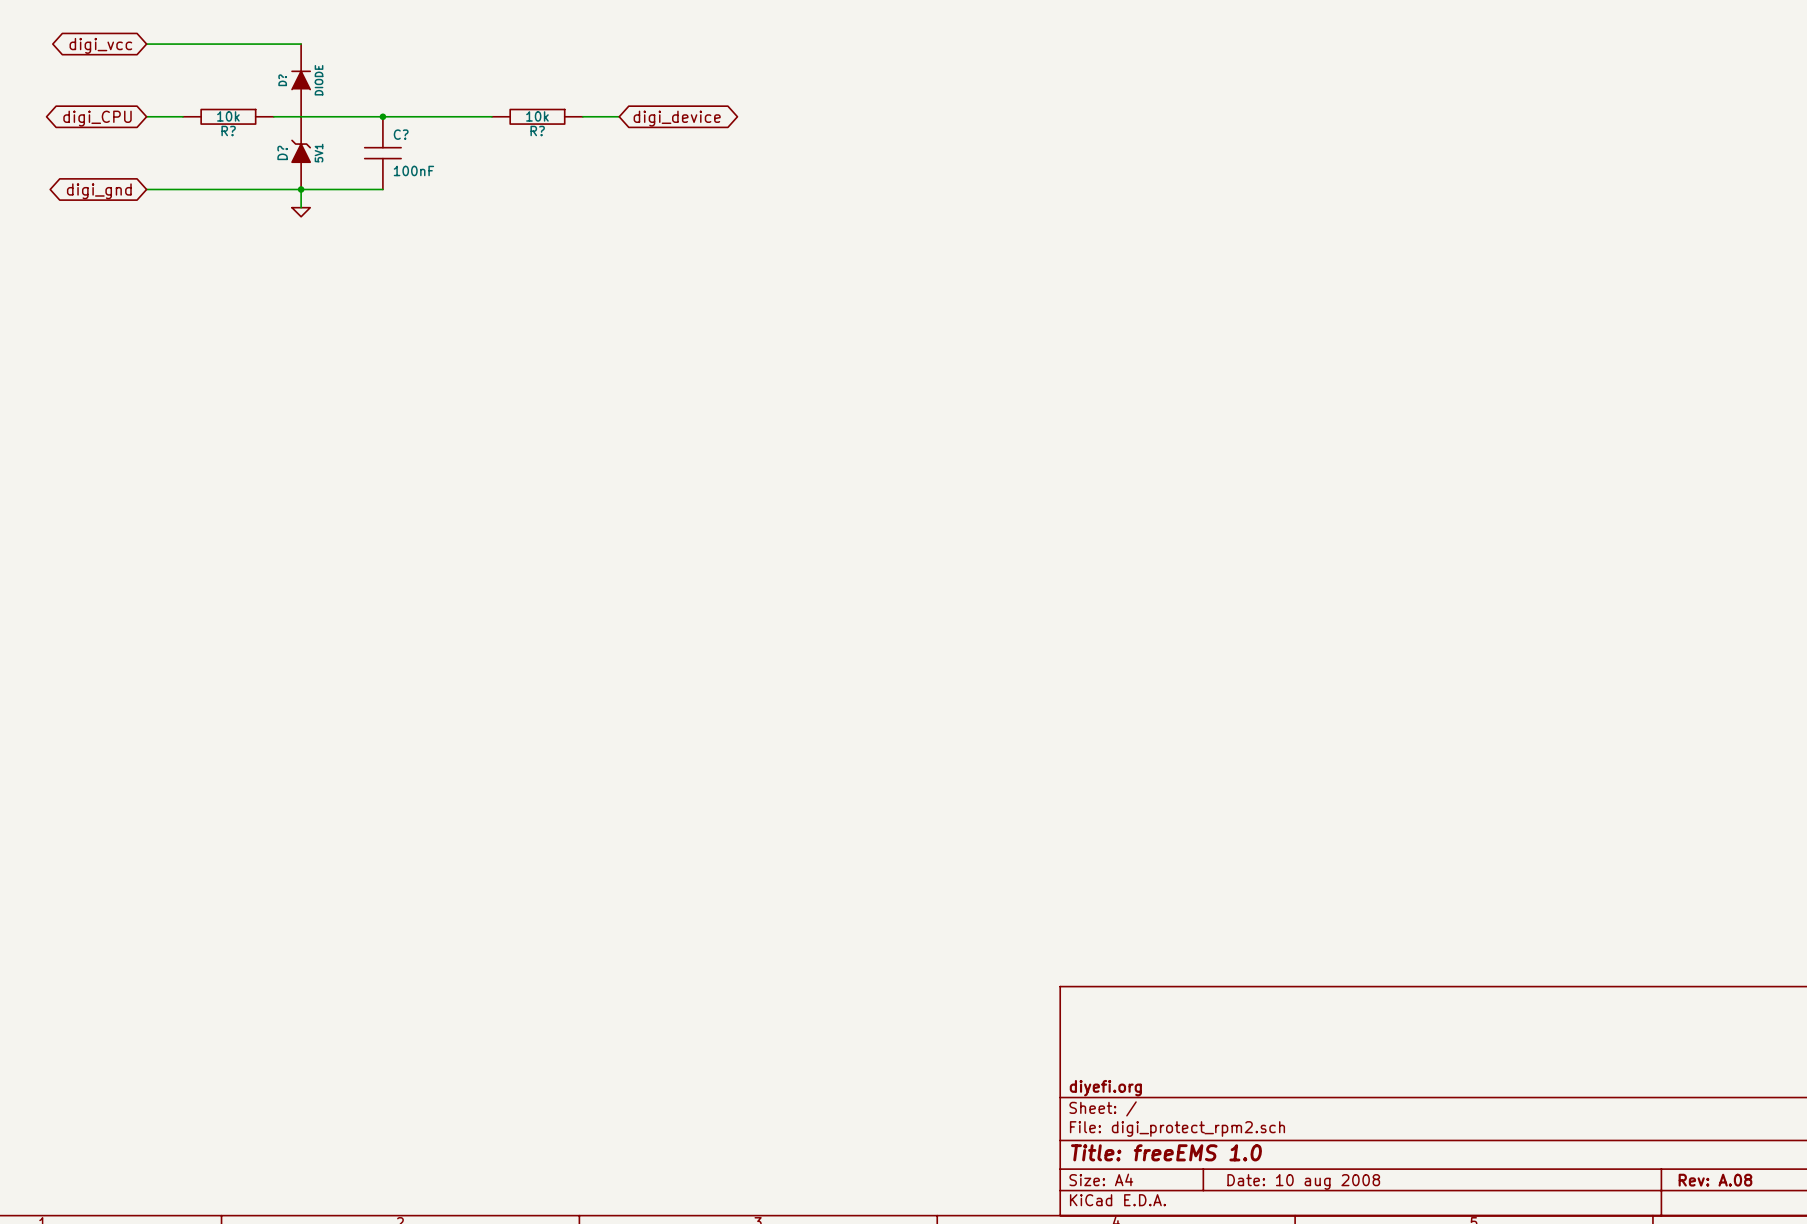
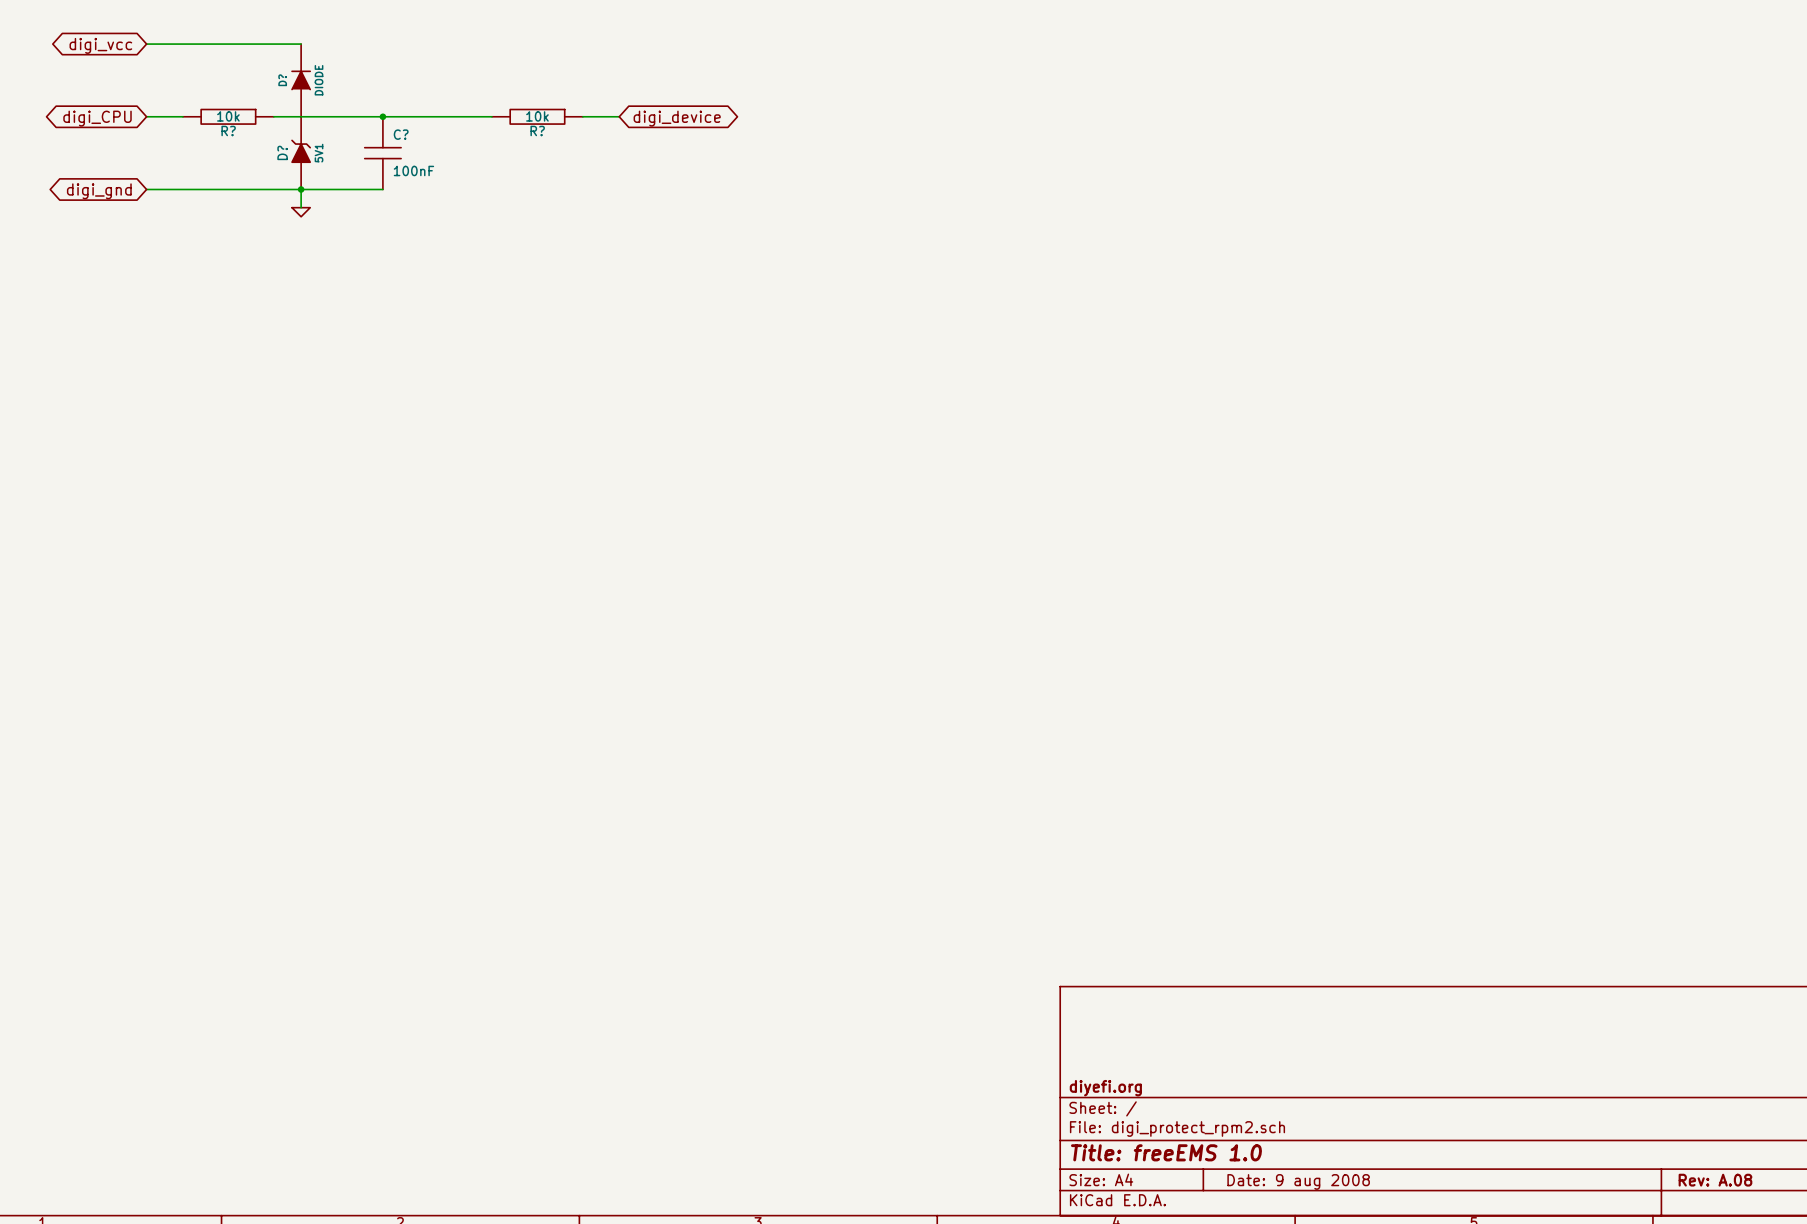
title block: Date: 10 aug 2008 (1303, 1181) -> Date: 9 aug 2008 (1298, 1181)

